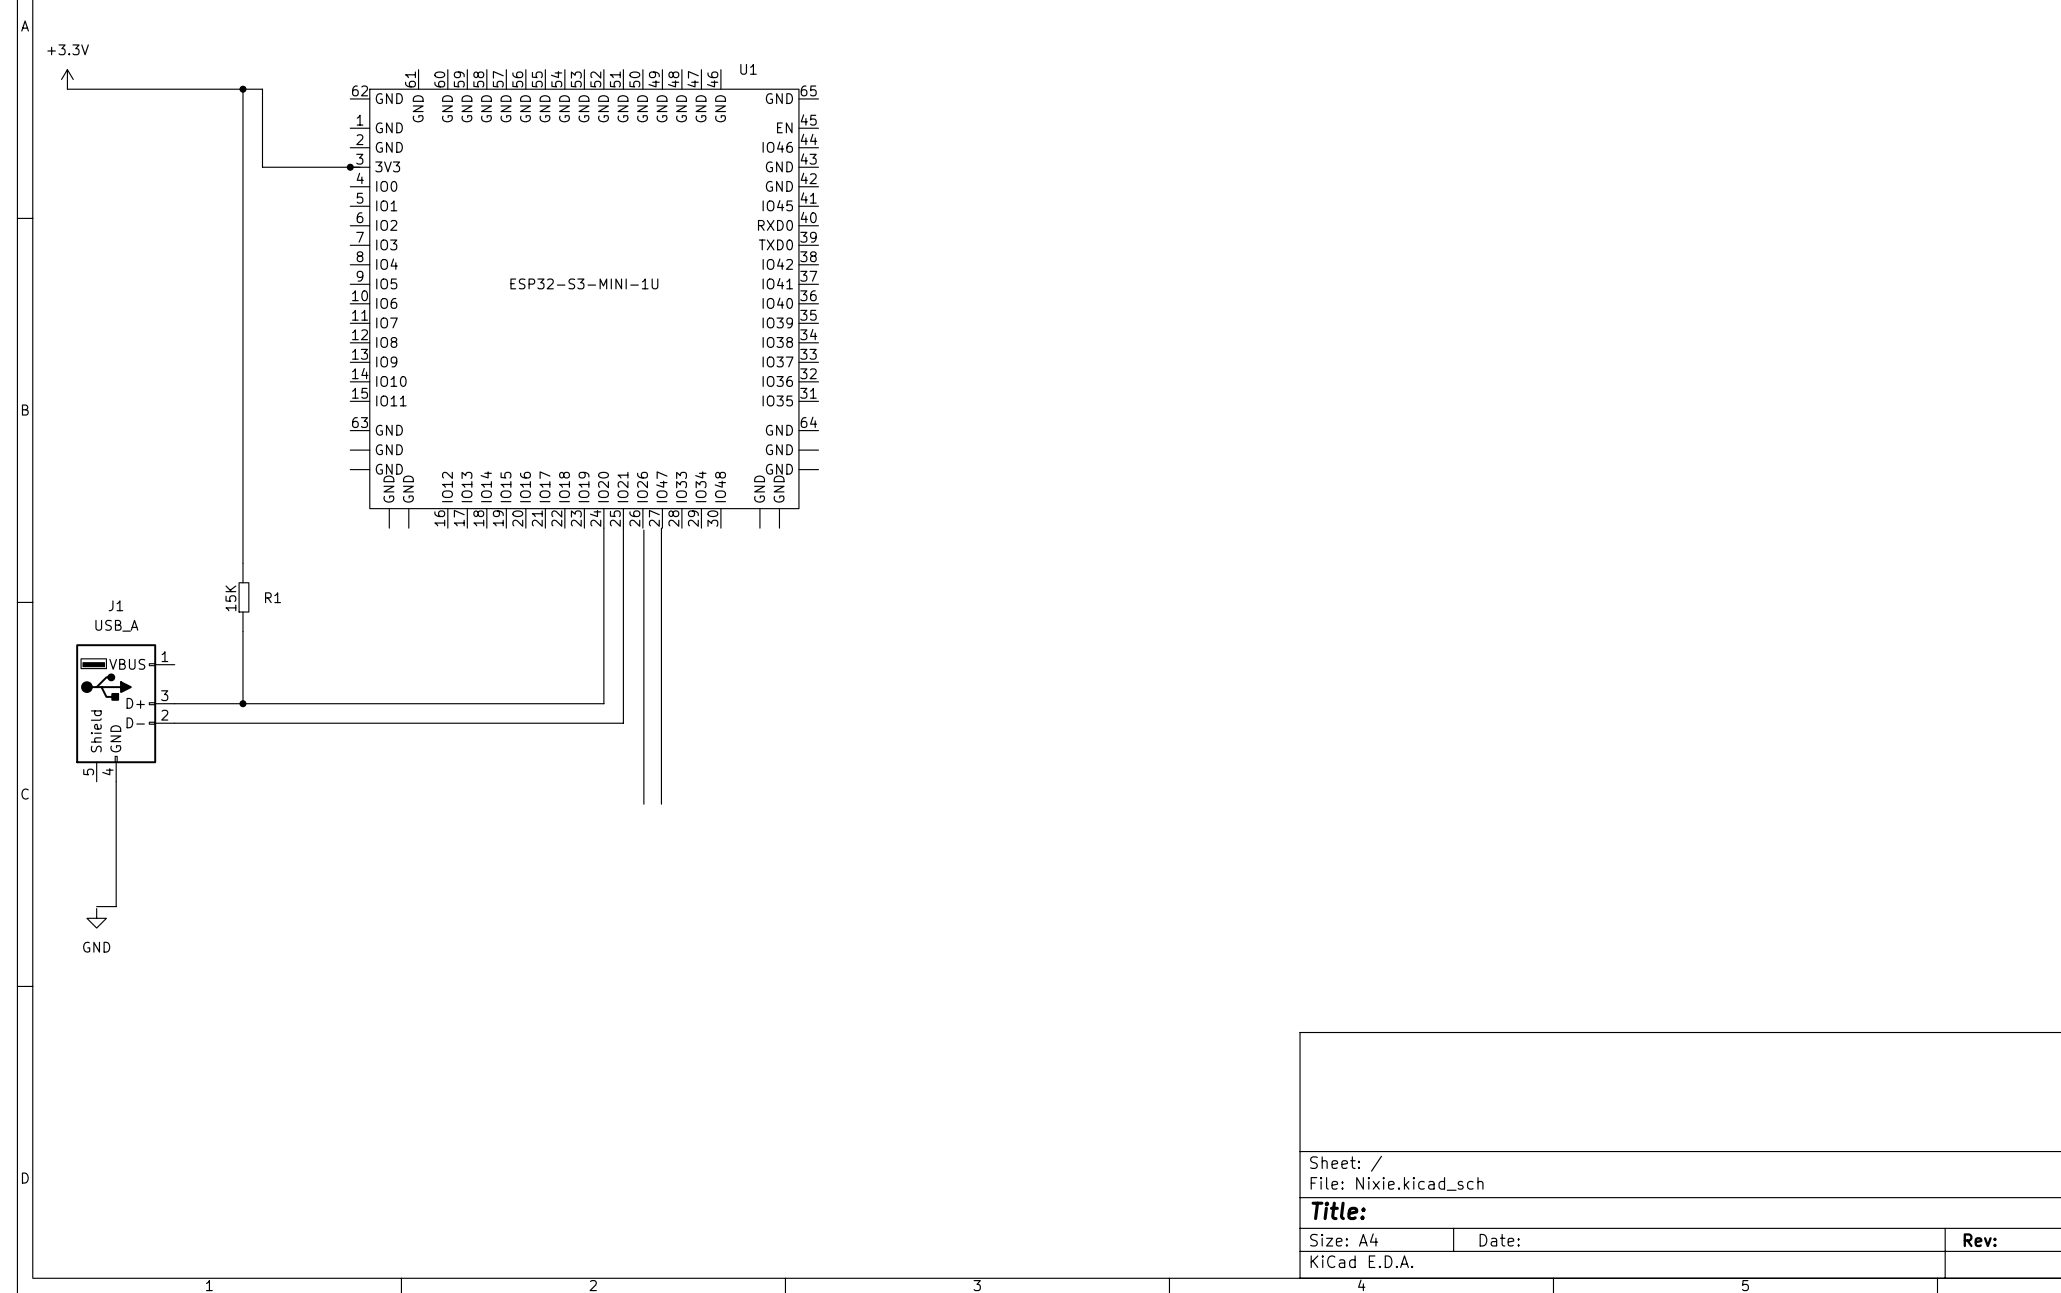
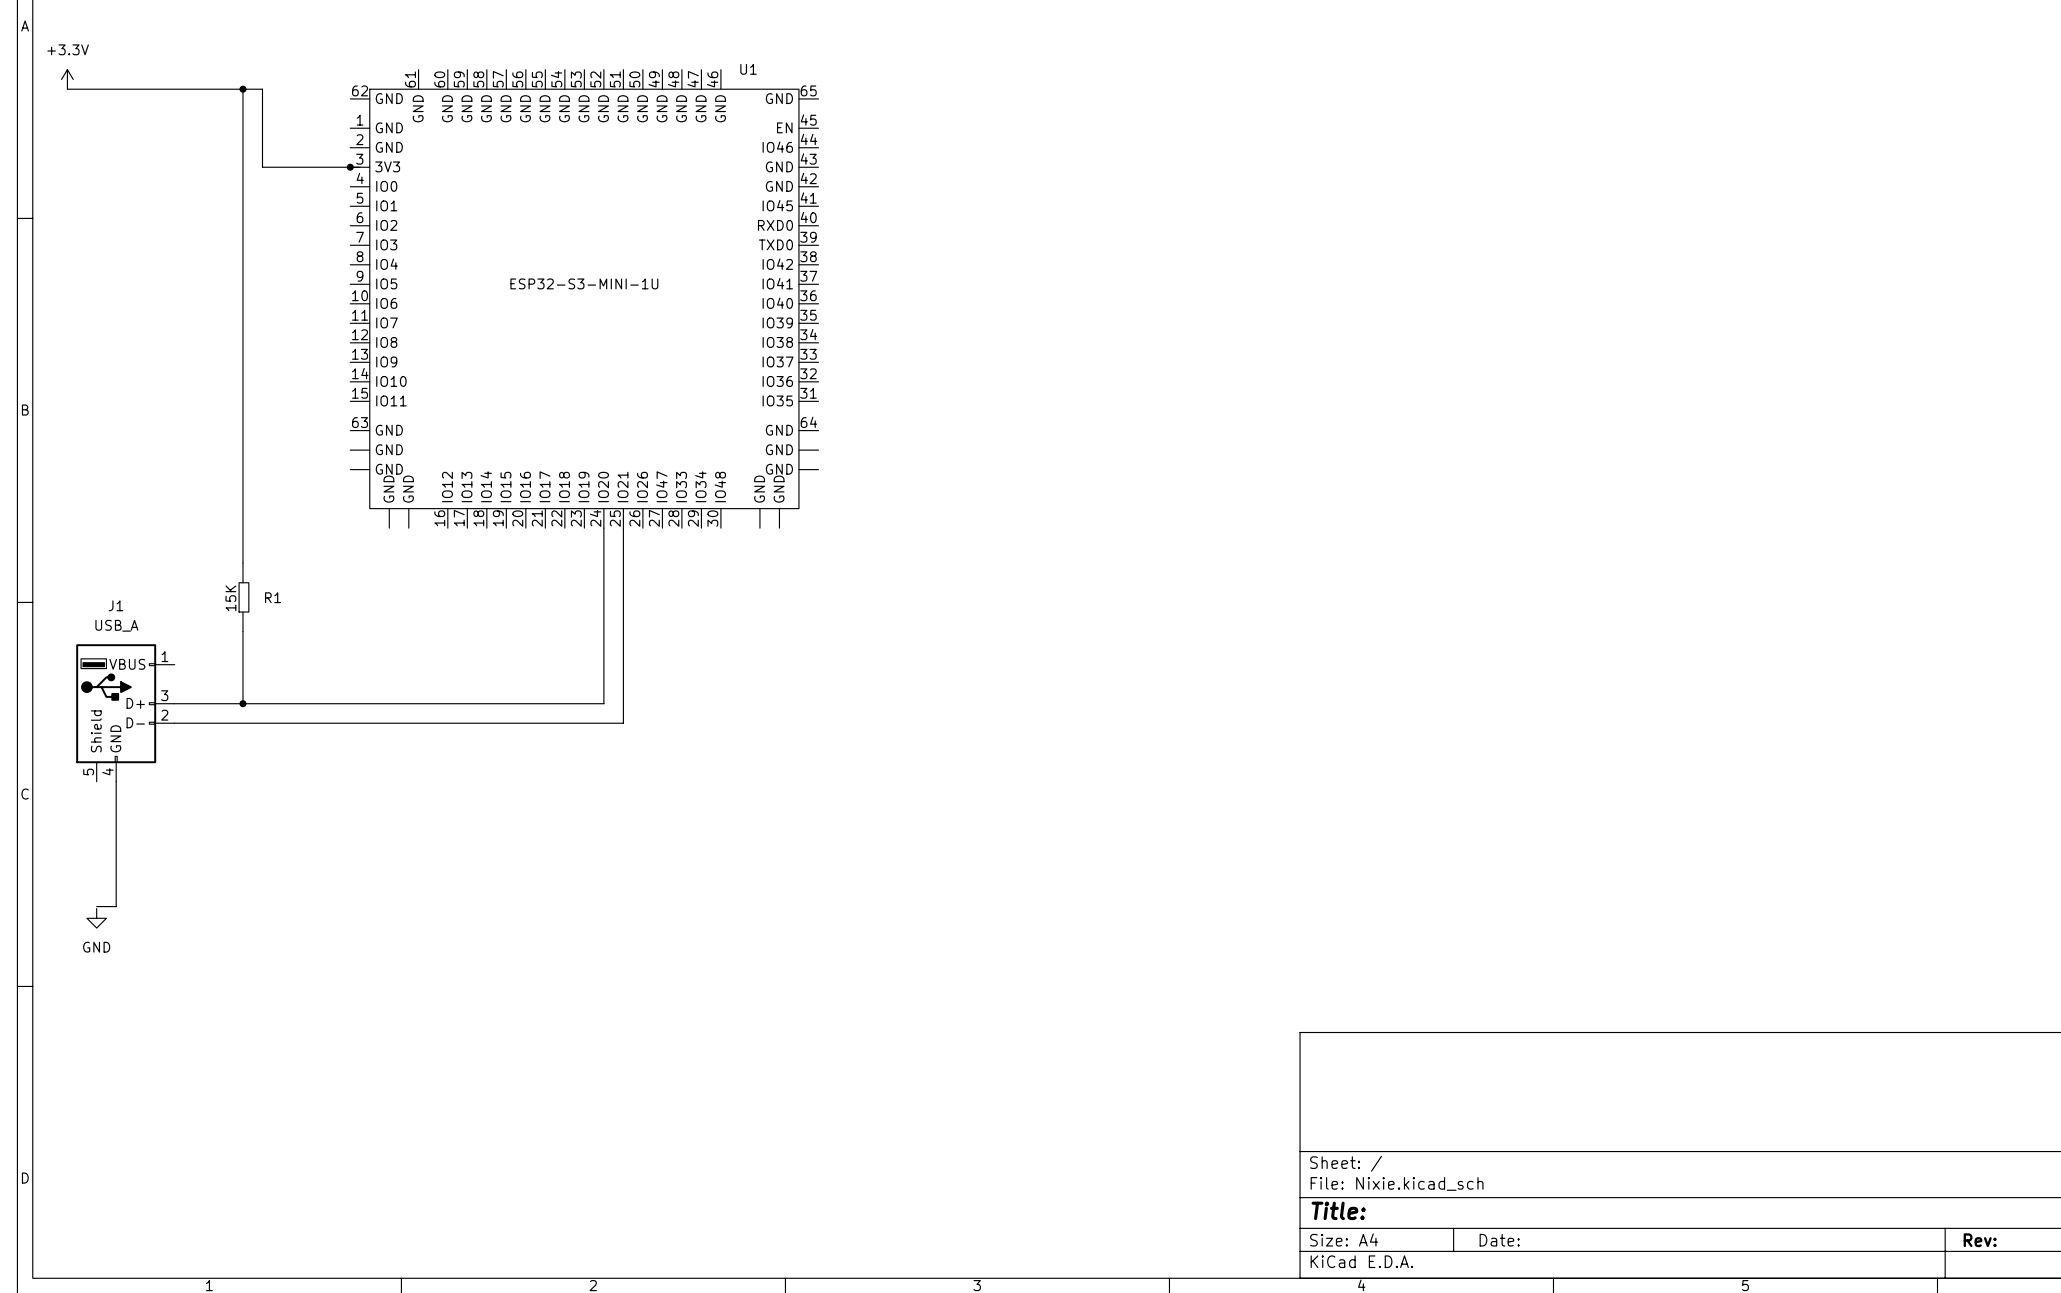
wire: (661, 528) (661, 804) -> none
wire: (643, 530) (643, 804) -> none

